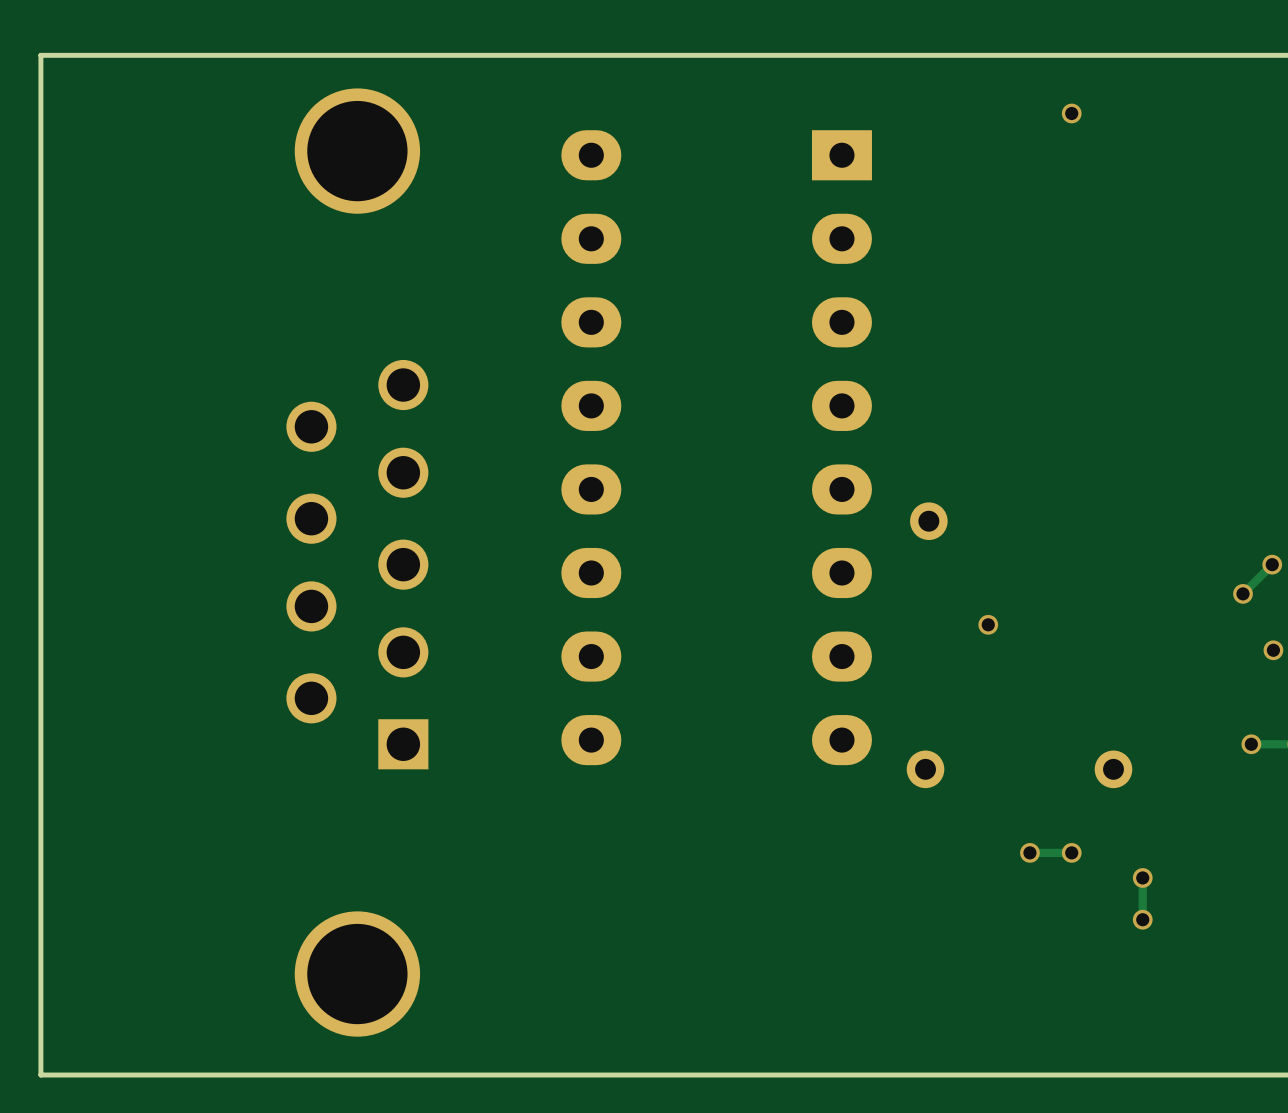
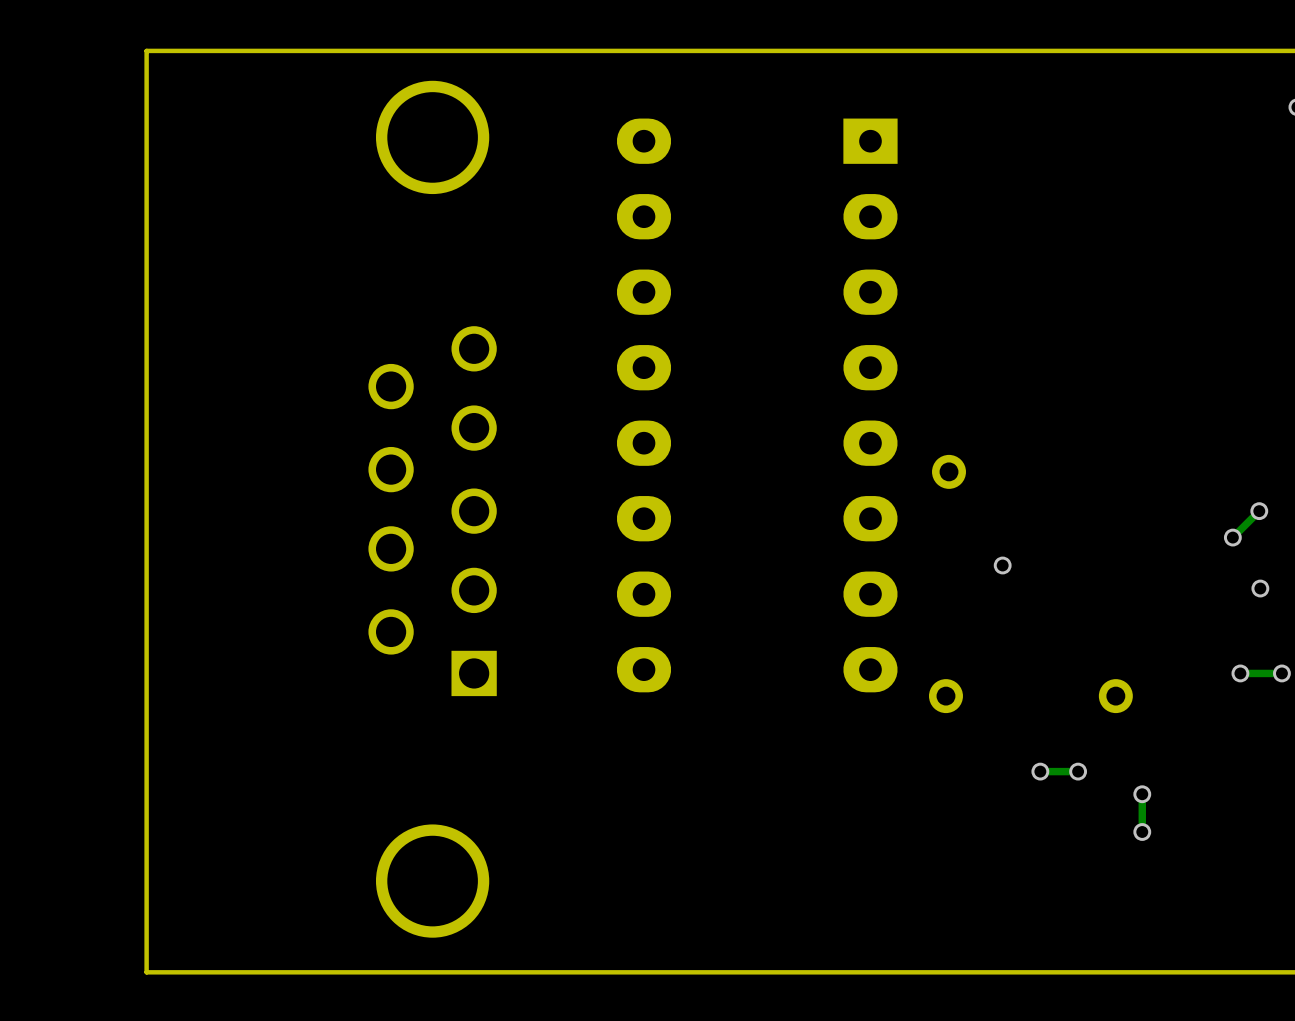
via: (1071, 113) -> none

